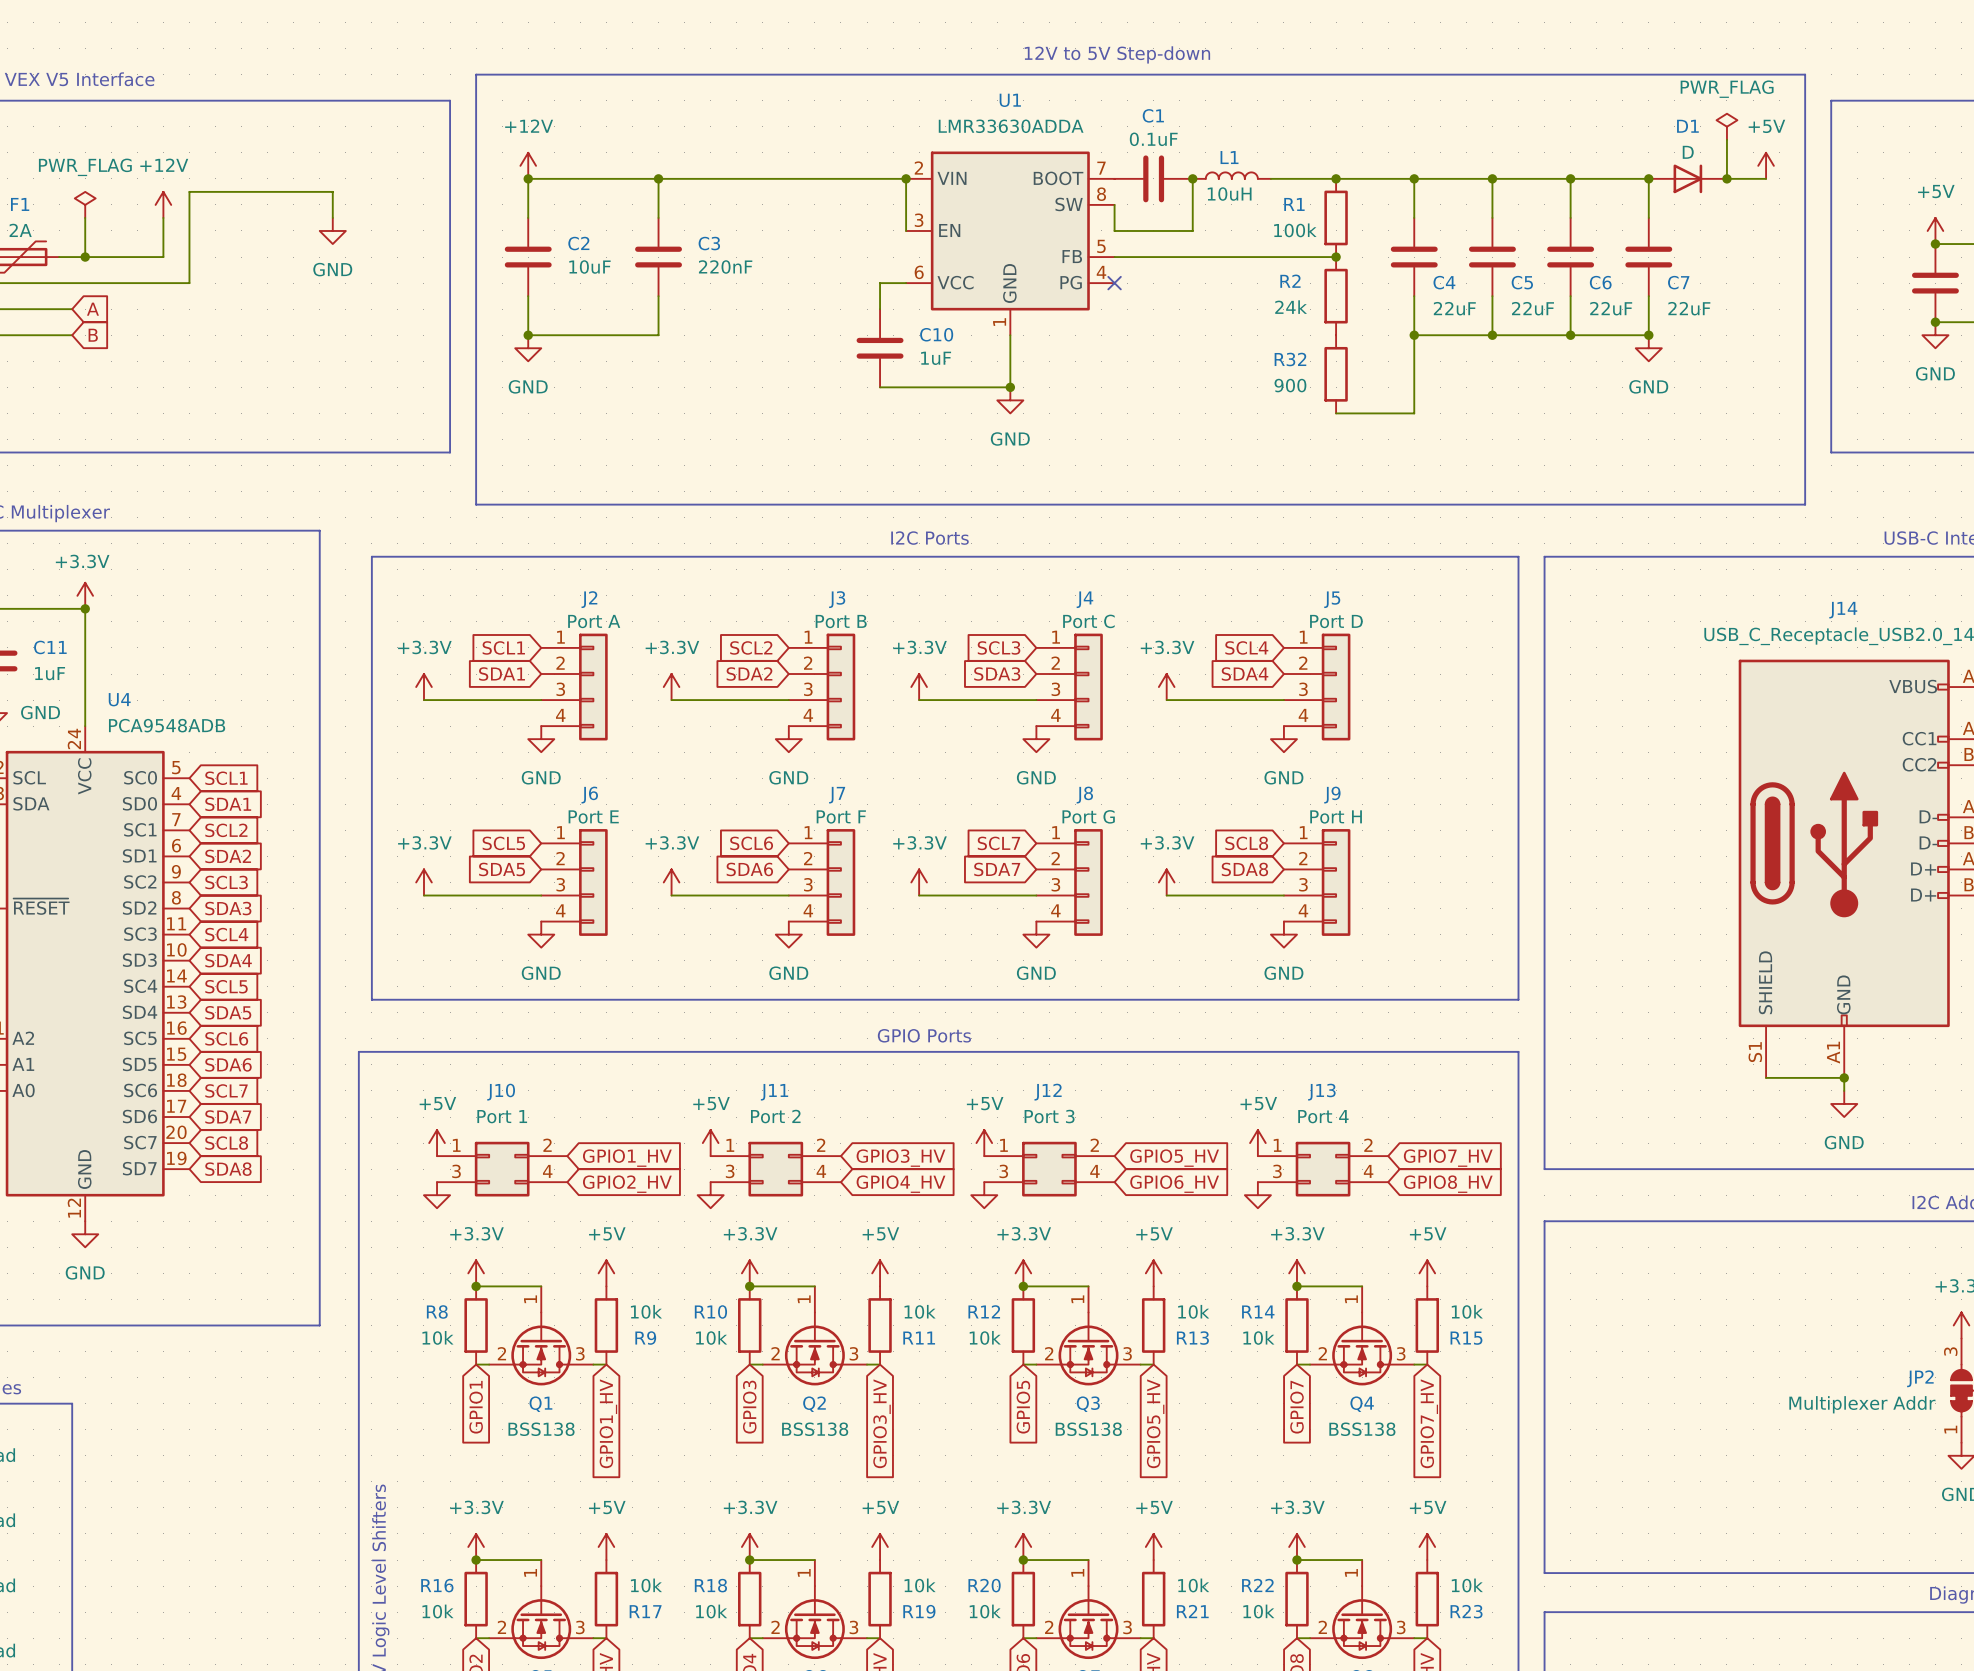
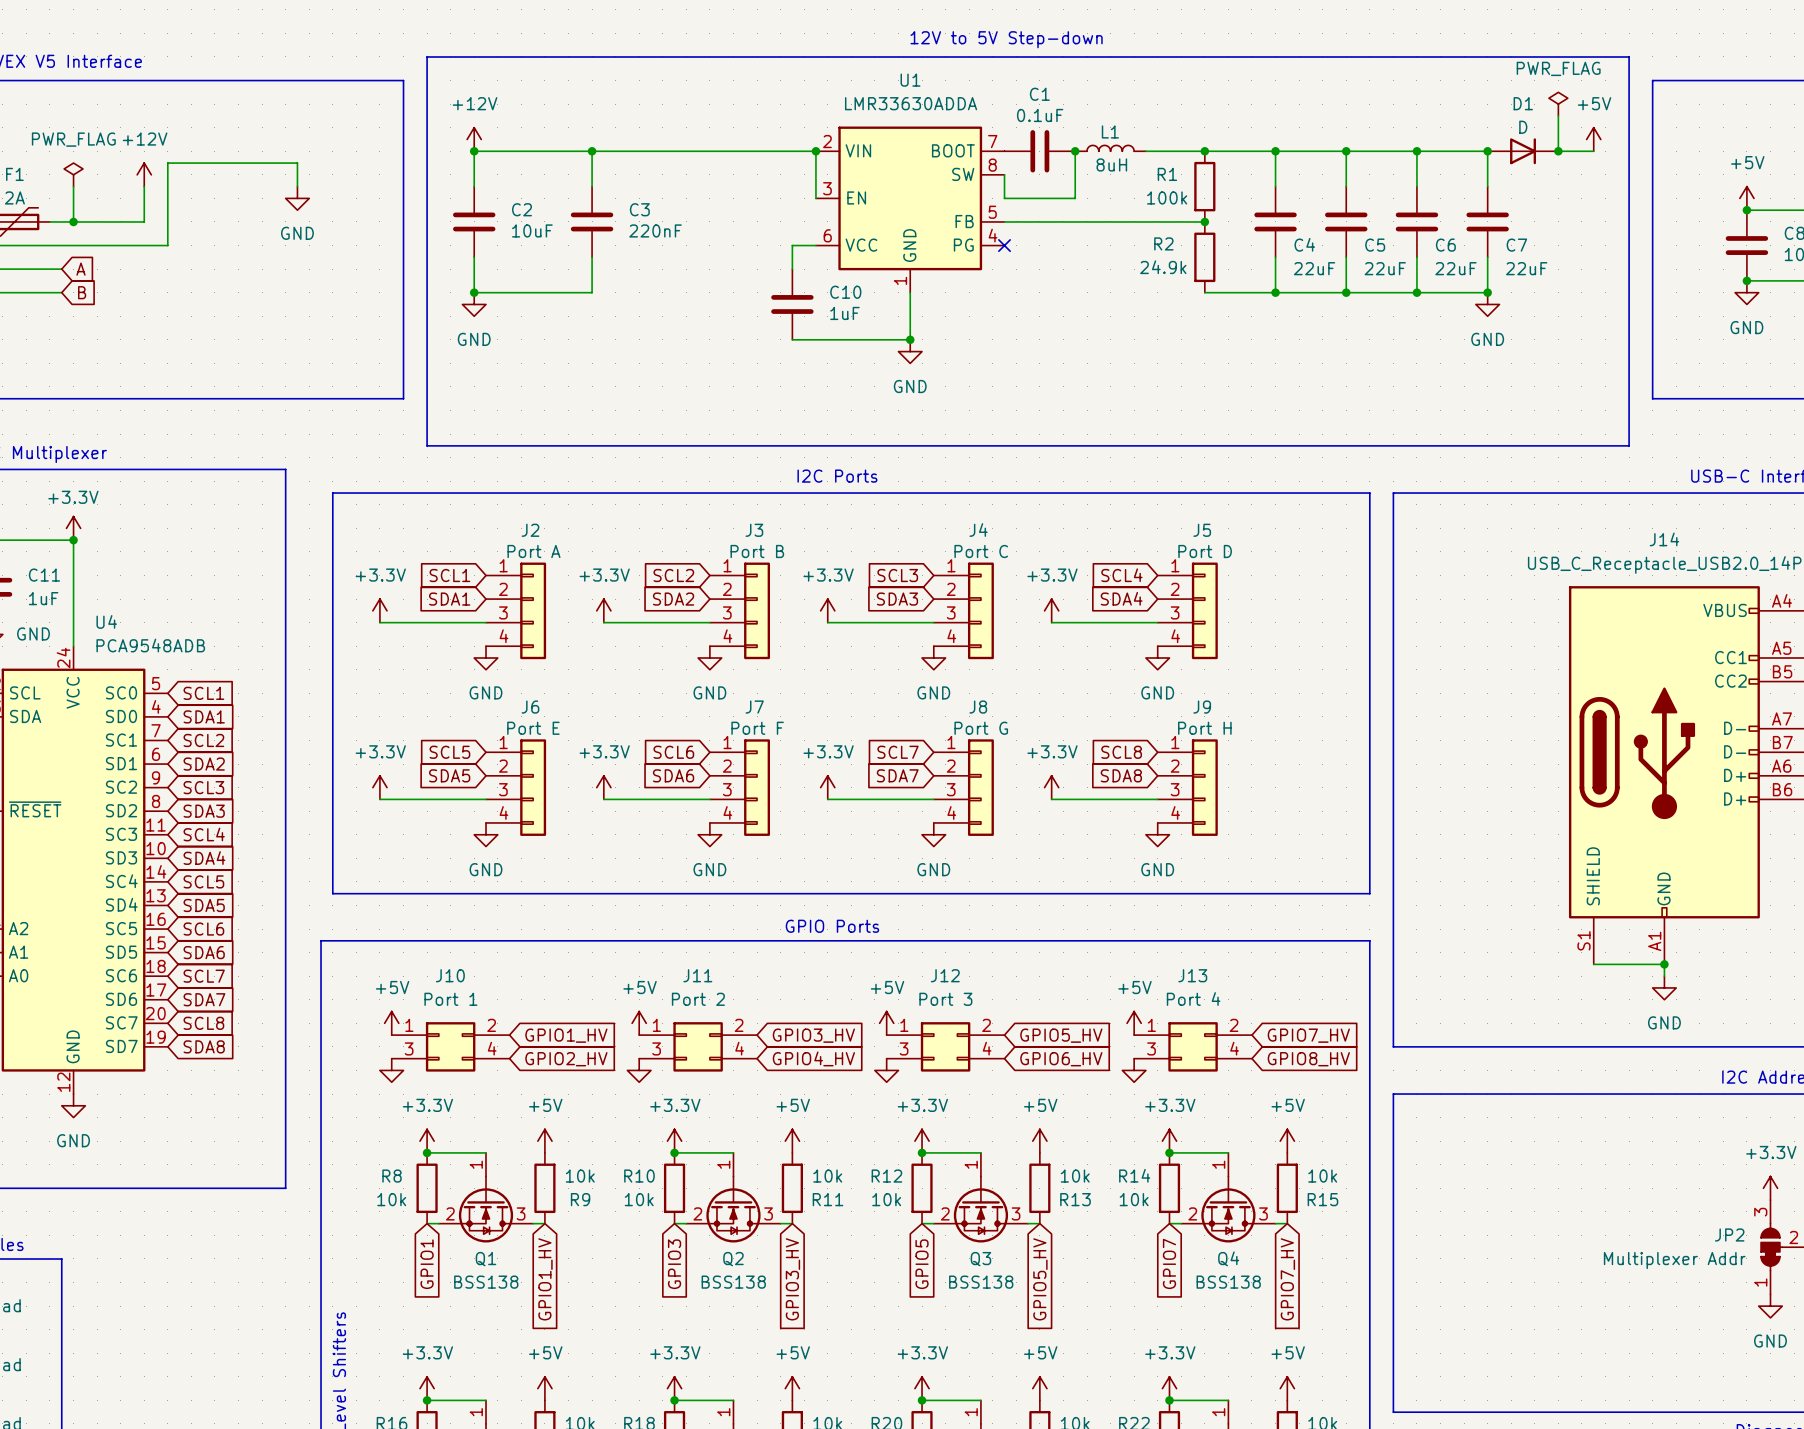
L1 value: 10uH (1229, 194) -> 8uH (1111, 164)
R2 value: 24k (1291, 307) -> 24.9k (1163, 267)
wire: (1414, 335) (1414, 413) (1336, 413) -> (1275, 292) (1204, 292)
R32: 900 (1336, 374) -> none

